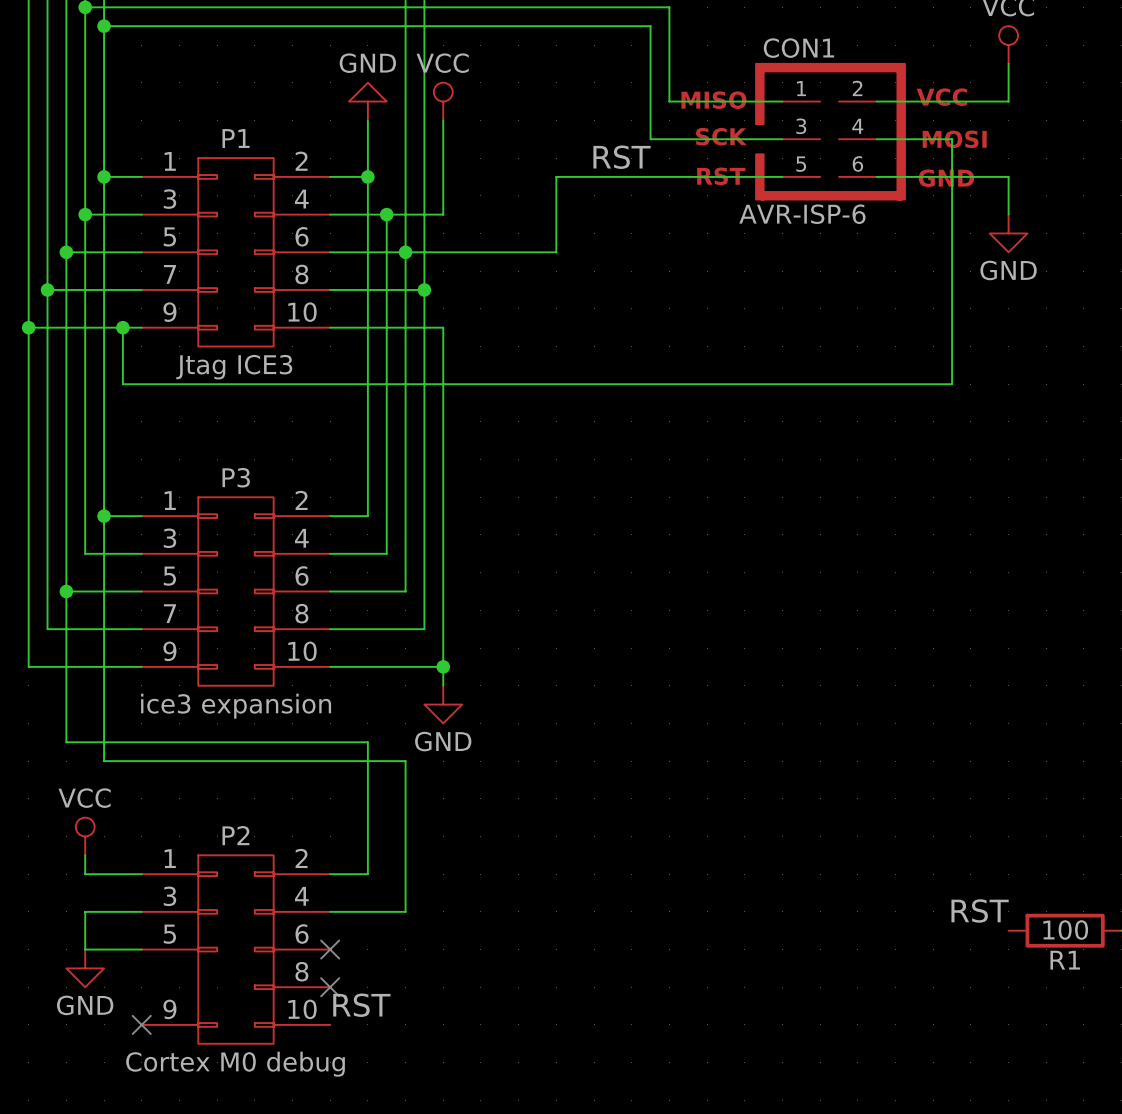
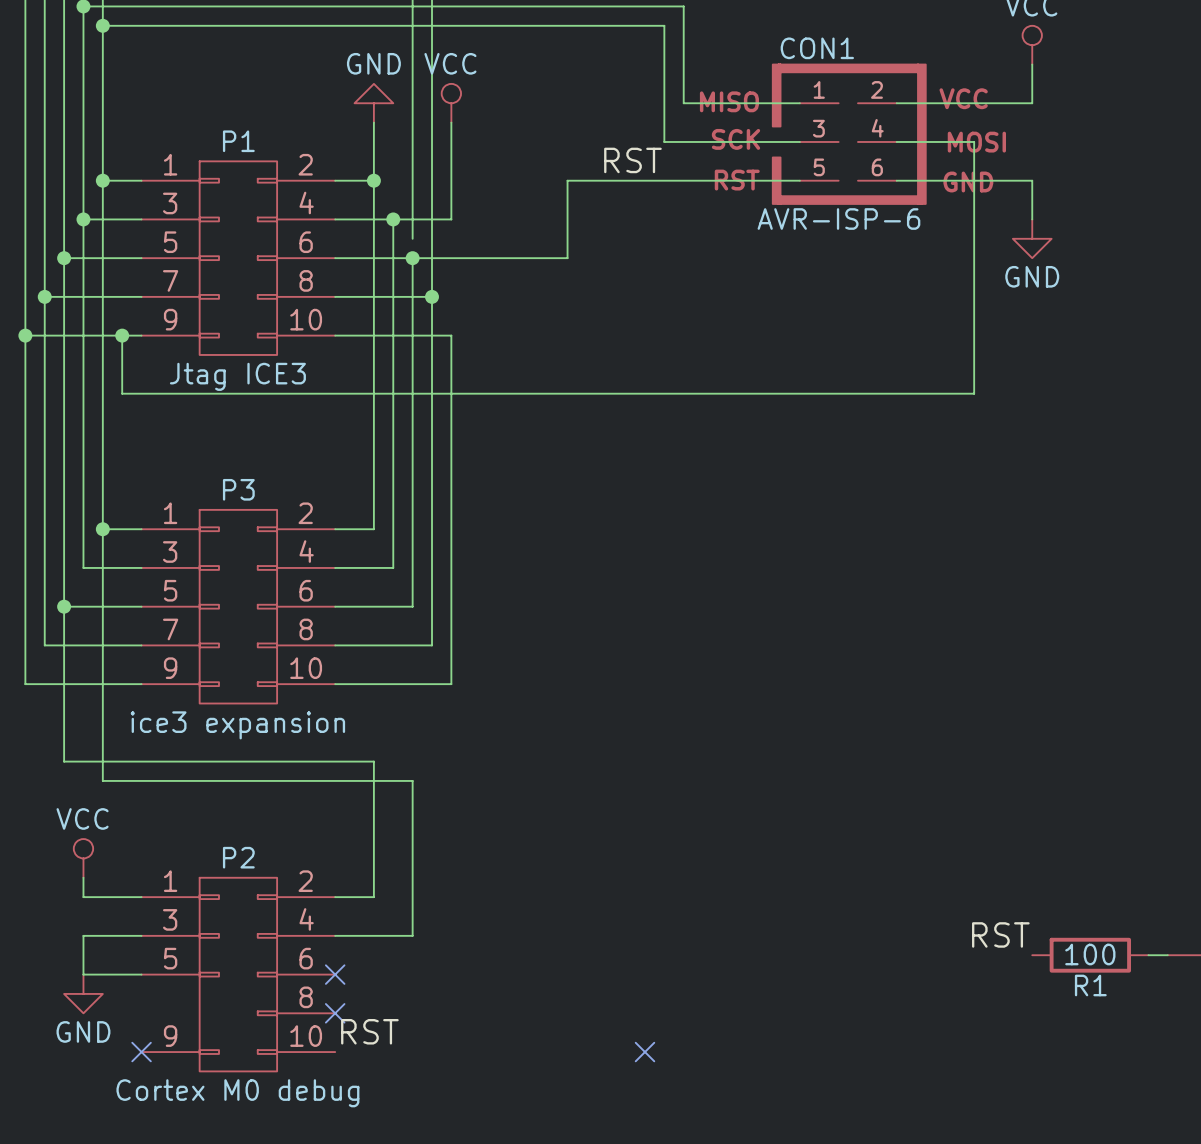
wire: (405, 233) (405, 252) -> none
wire: (443, 666) (443, 685) -> none
junction: (443, 666) -> none
power symbol: GND (443, 704) -> none
no-connect mark: none -> (644, 1052)

